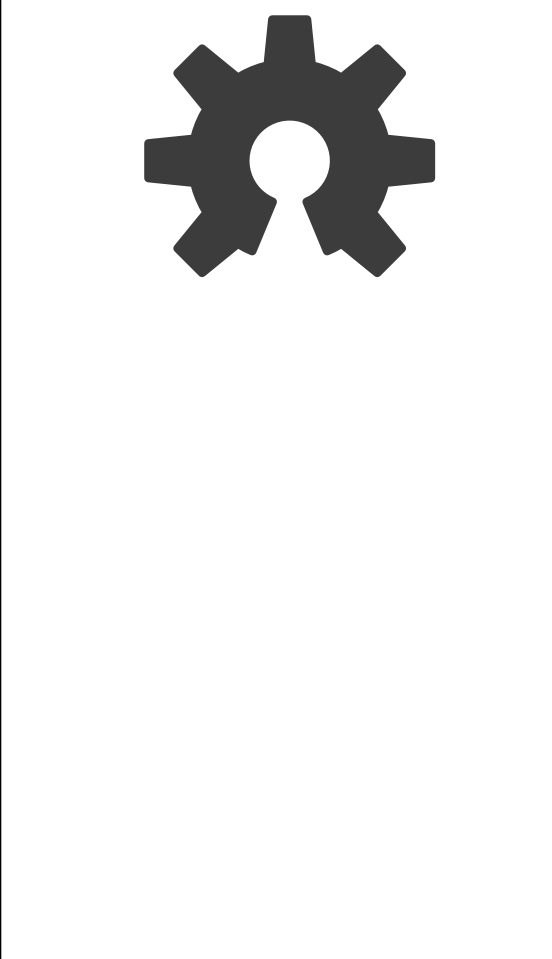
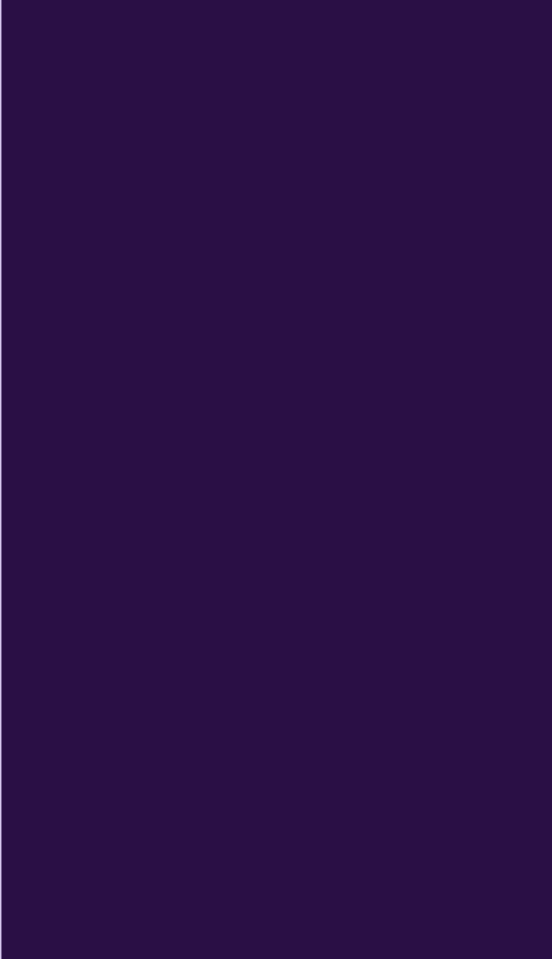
drawing: [144, 15, 436, 278] -> none

